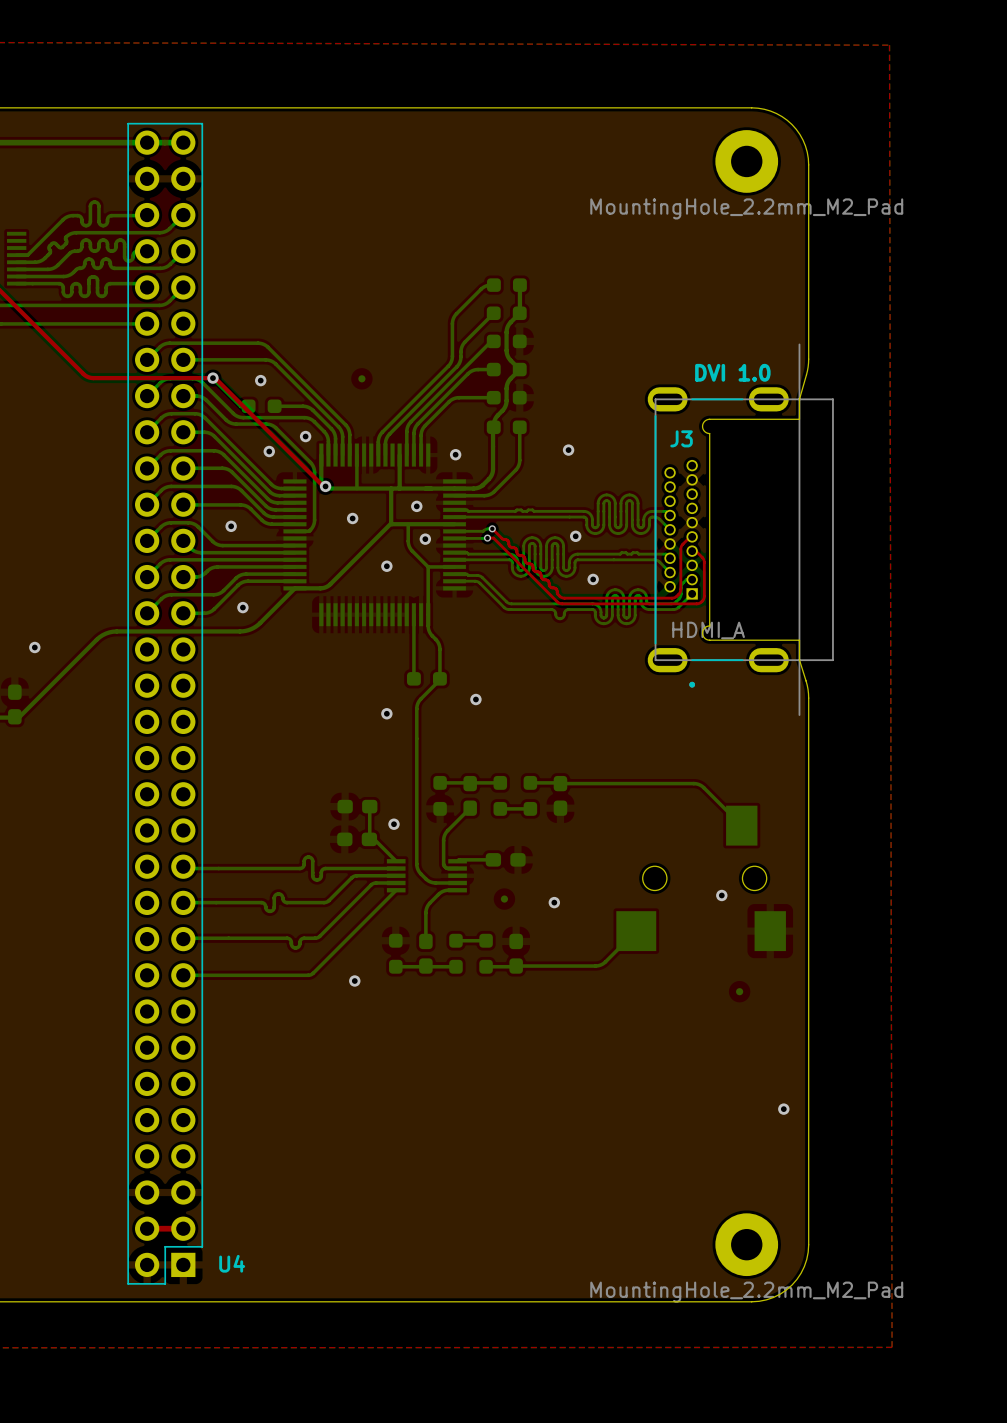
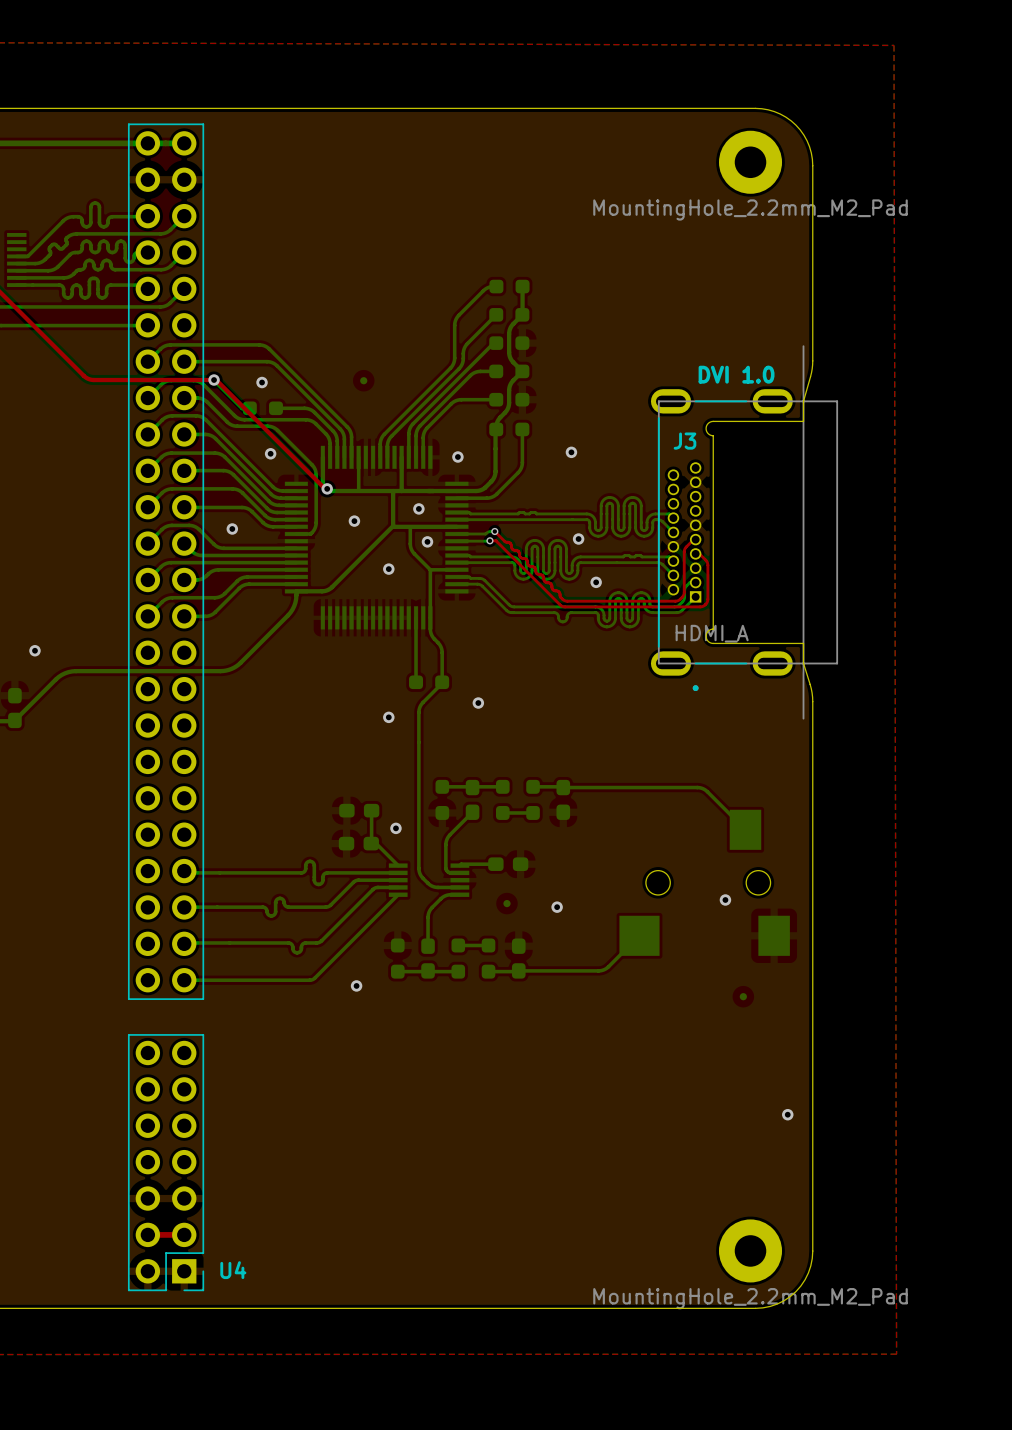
U4 footprint: [127, 122, 204, 1285] -> [127, 123, 205, 1292]
via: (305, 436) -> none
bottom track: (294, 588) (258, 624) (245, 630) (116, 631) (105, 633) (96, 639) (19, 716) (14, 716) -> (296, 591) (295, 602) (290, 612) (240, 662) (231, 668) (220, 671) (68, 672) (55, 679) (14, 720)
via: (242, 607) -> none

